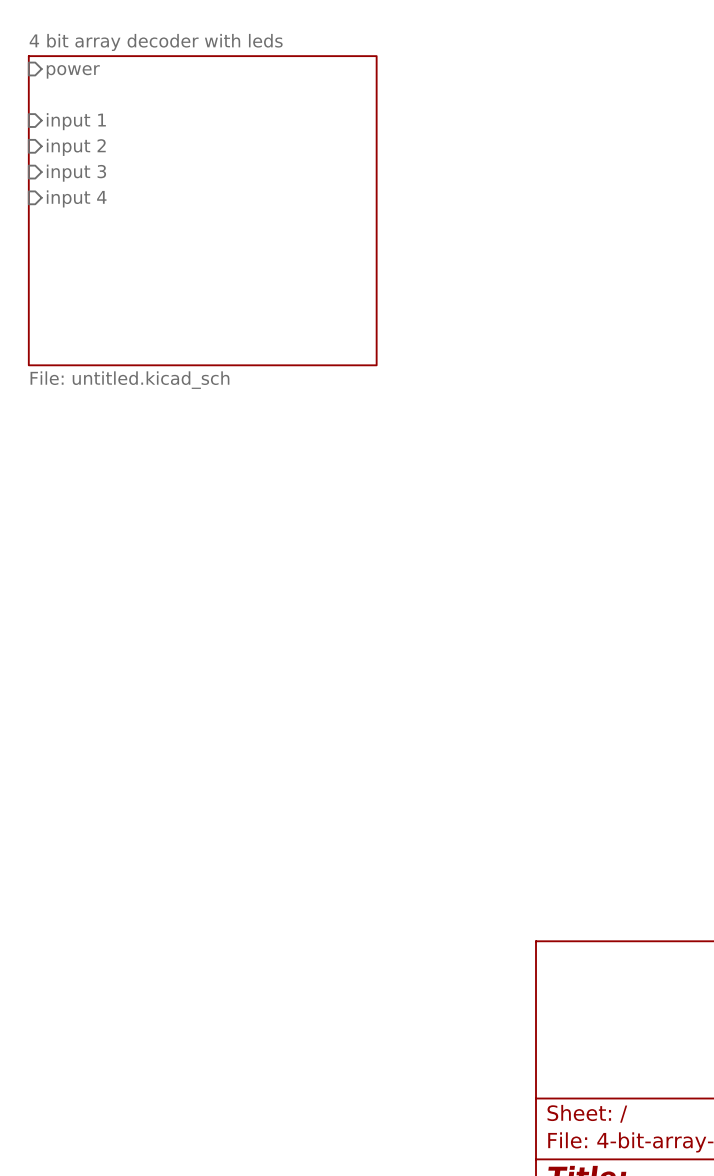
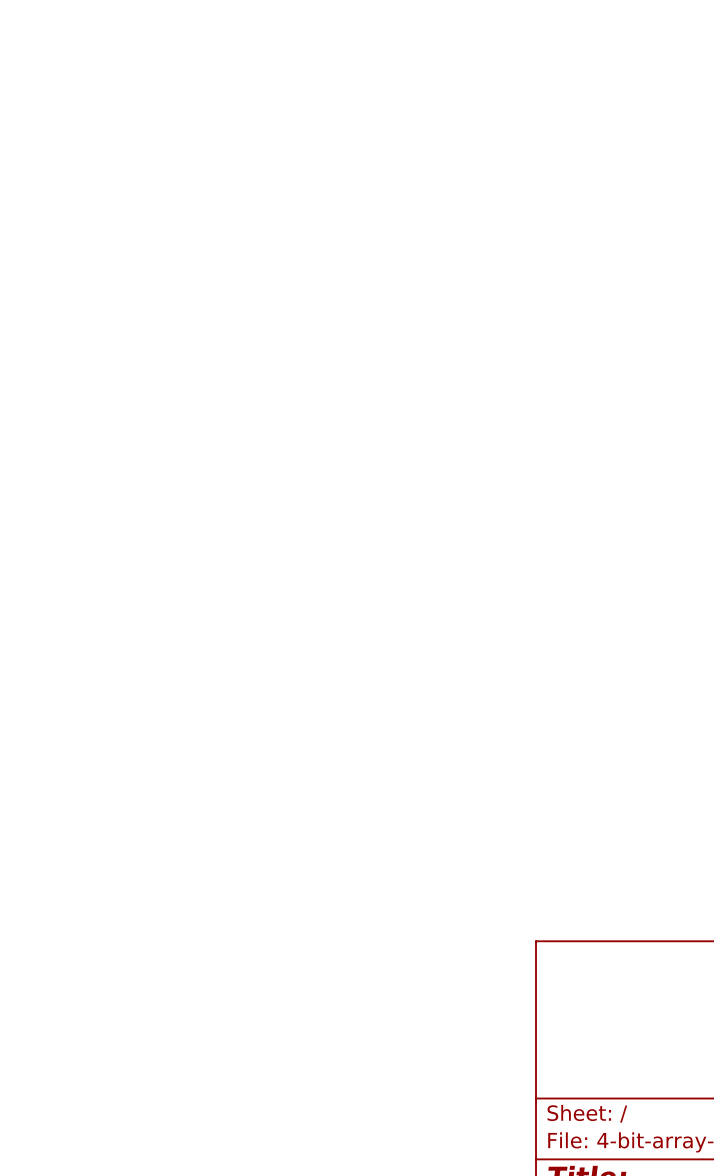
sheet pin: power (73, 71) -> none
sheet pin: input 1 (76, 121) -> none
sheet pin: input 2 (76, 147) -> none
sheet pin: input 3 (76, 173) -> none
sheet pin: input 4 (76, 198) -> none
sheet 4 bit array decoder with leds: File: untitled.kicad_sch (202, 210) -> none

